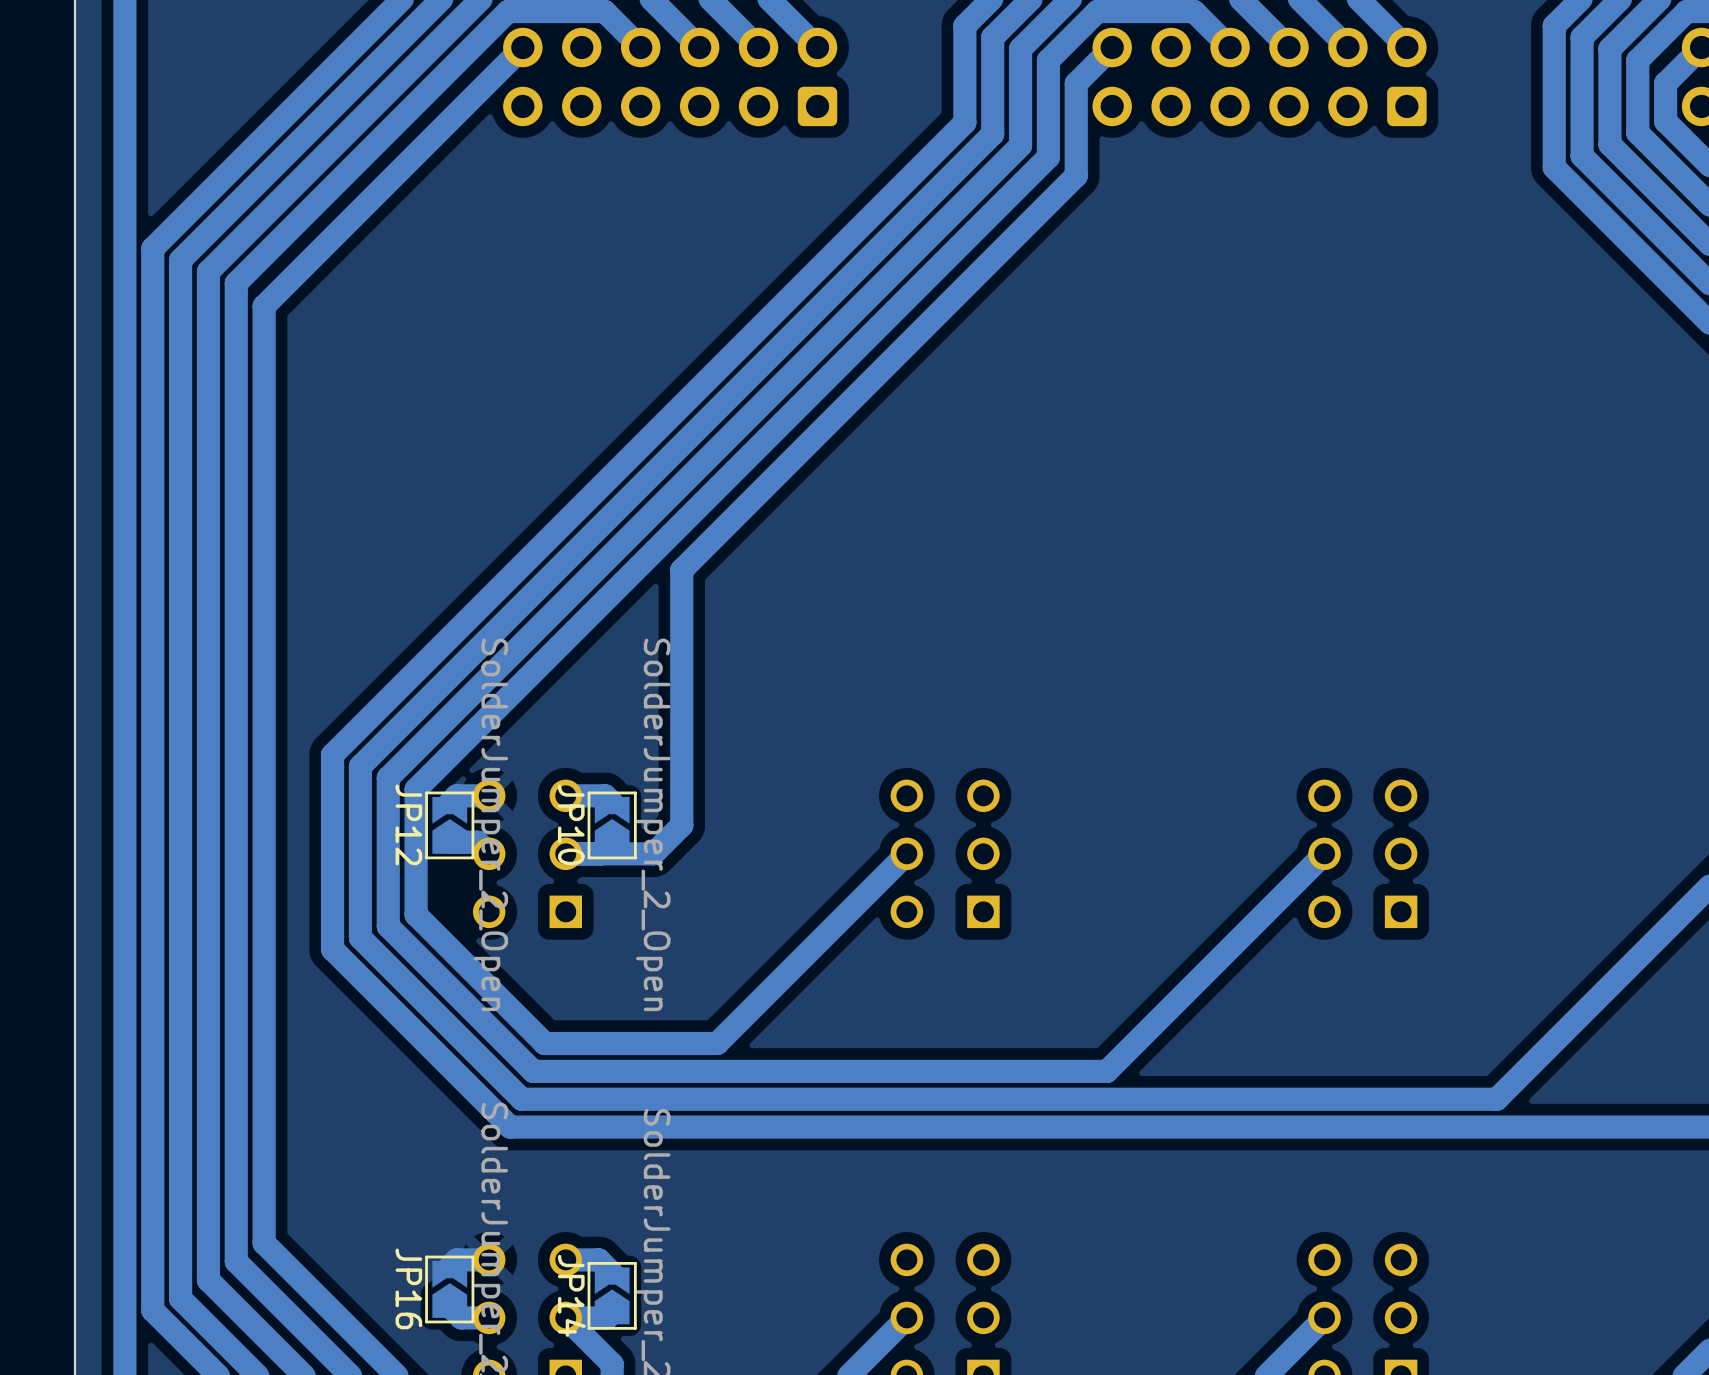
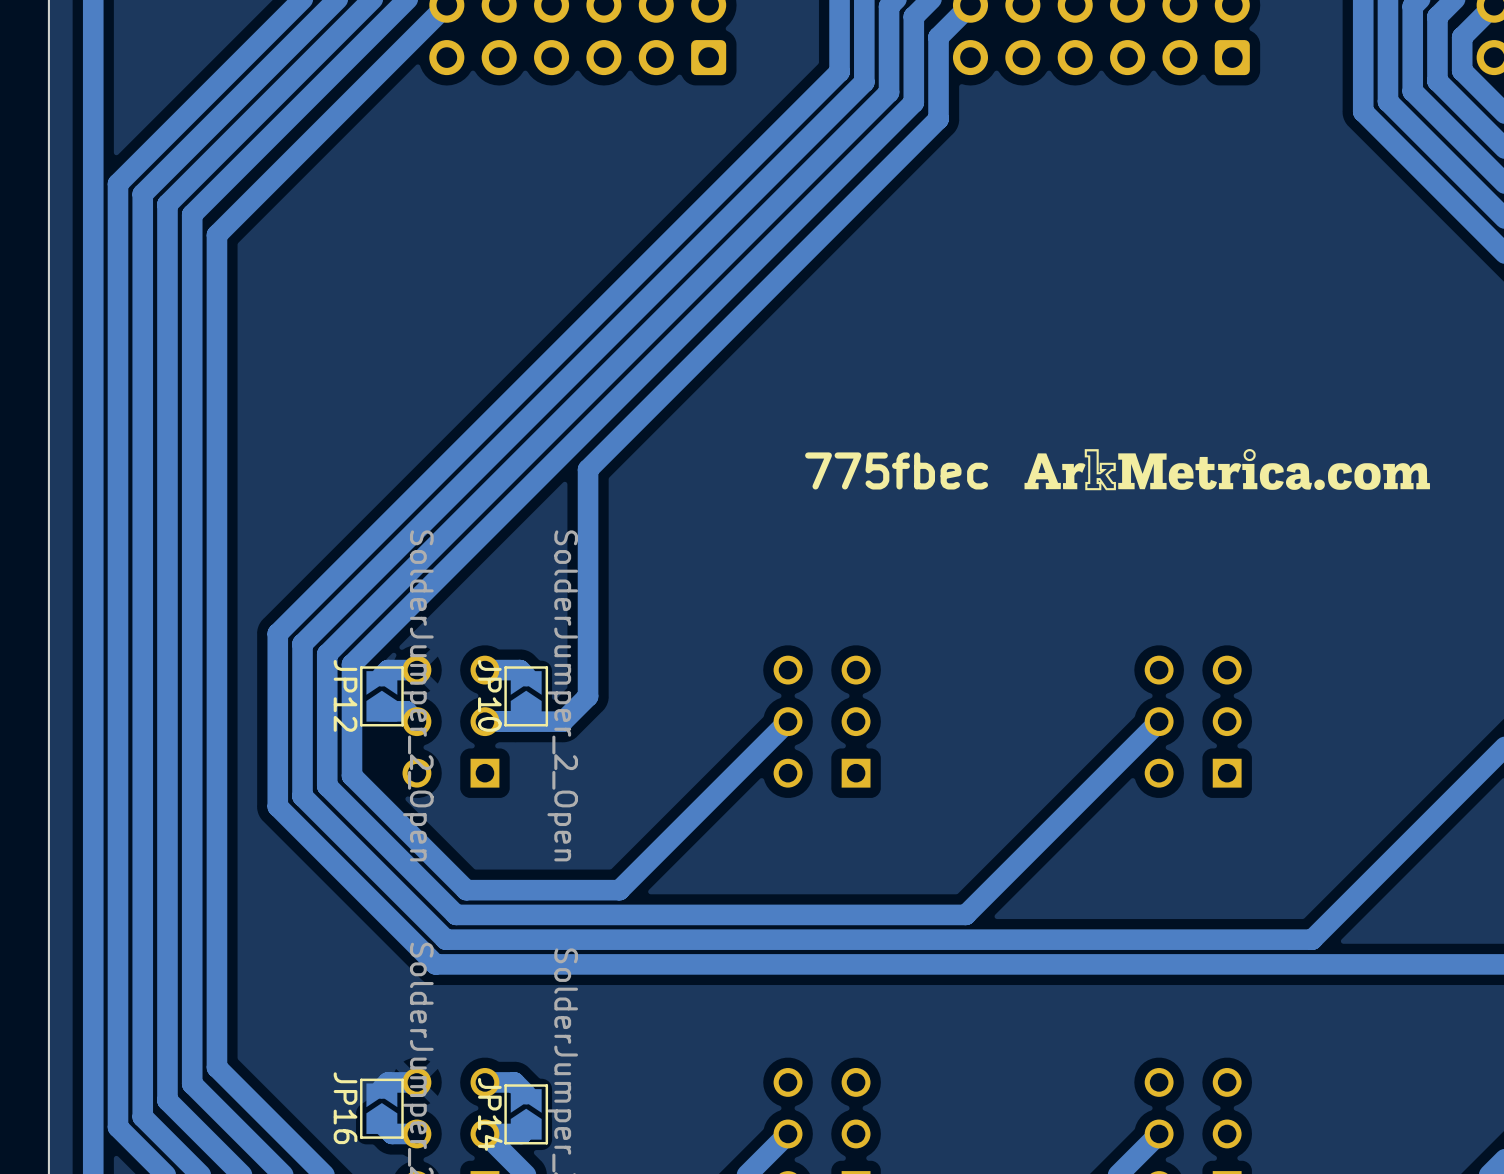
drawing: none -> [1024, 449, 1430, 491]
text: none -> 775fbec (896, 470)

